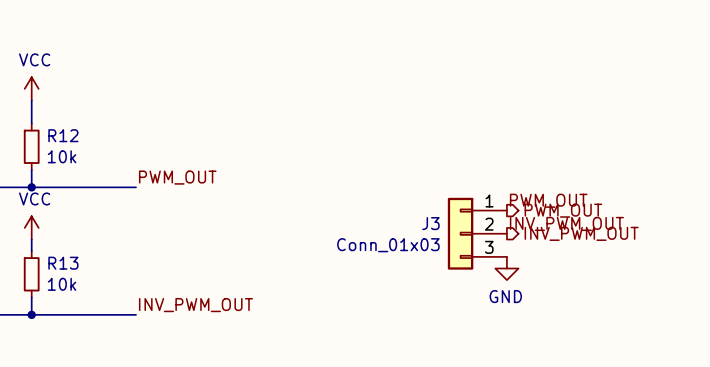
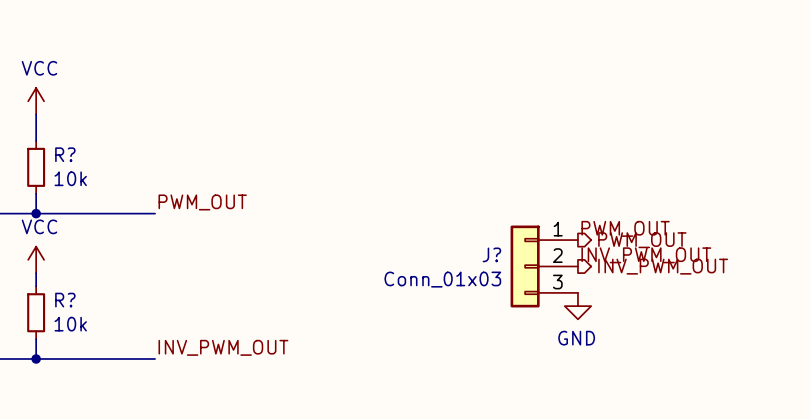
R12 name: R12 (63, 135) -> R? (65, 154)
J3 name: J3 (430, 223) -> J? (491, 254)
R13 name: R13 (63, 263) -> R? (65, 300)

